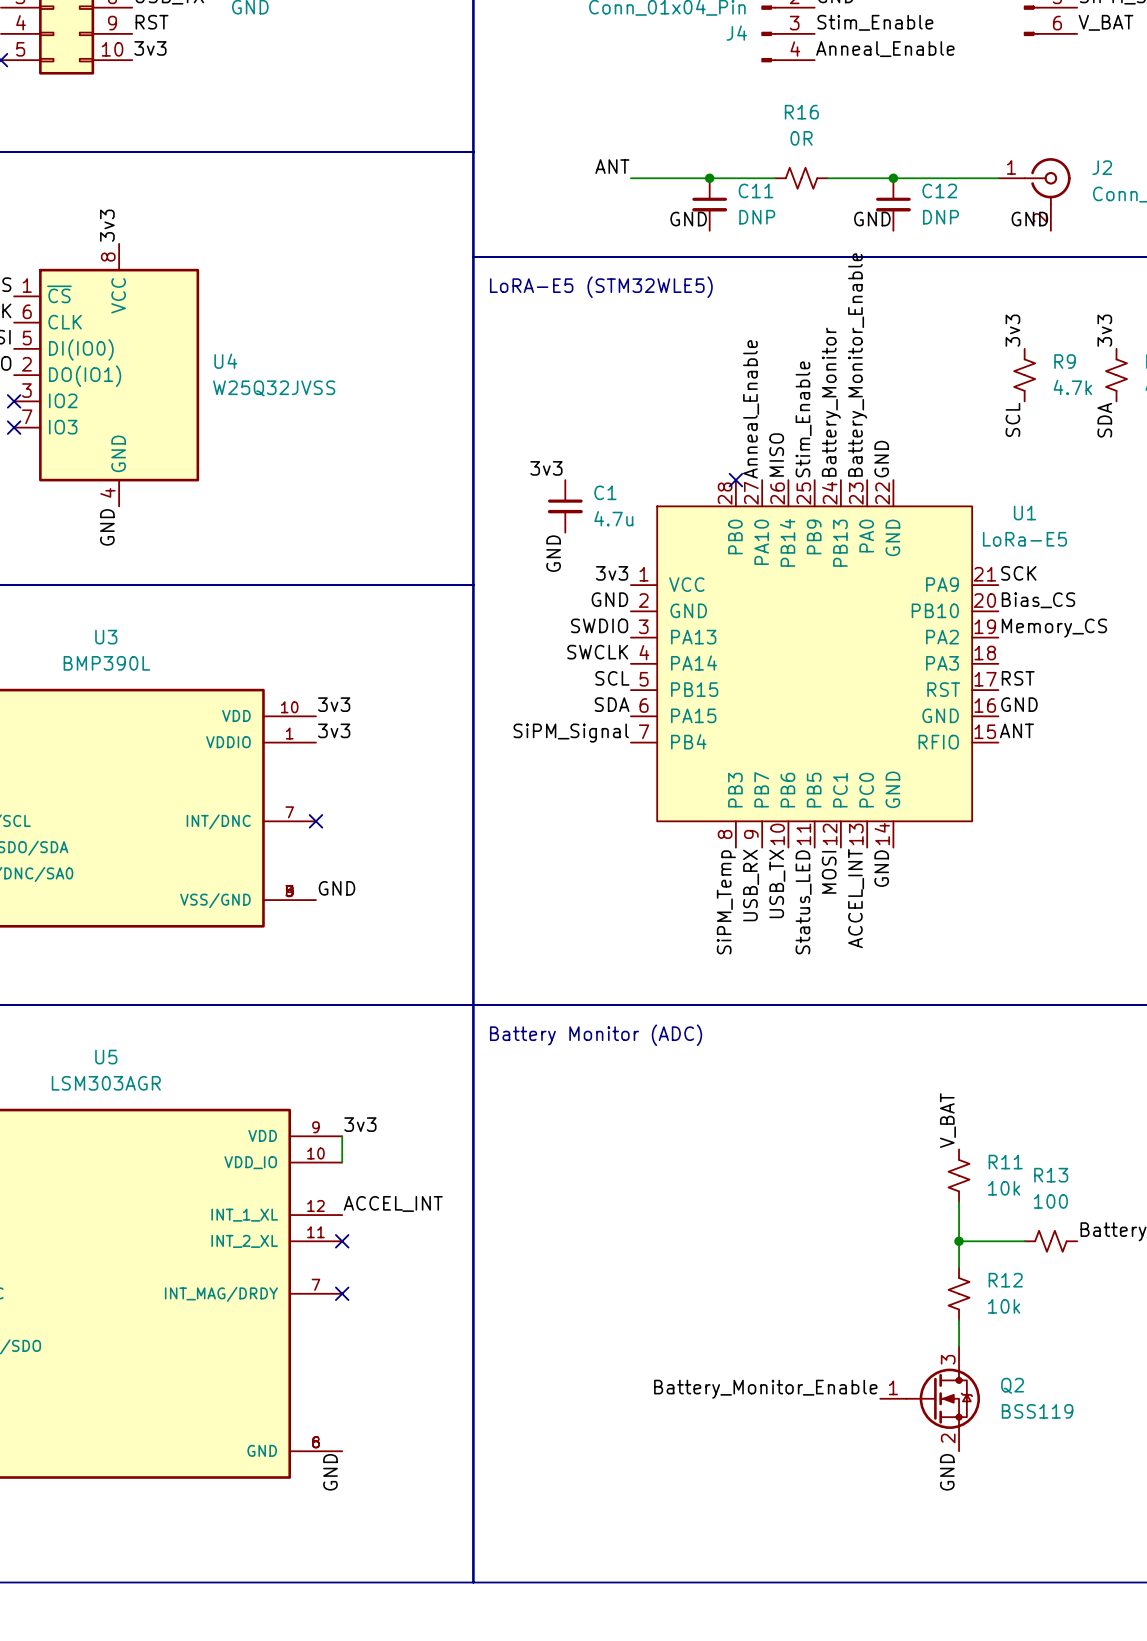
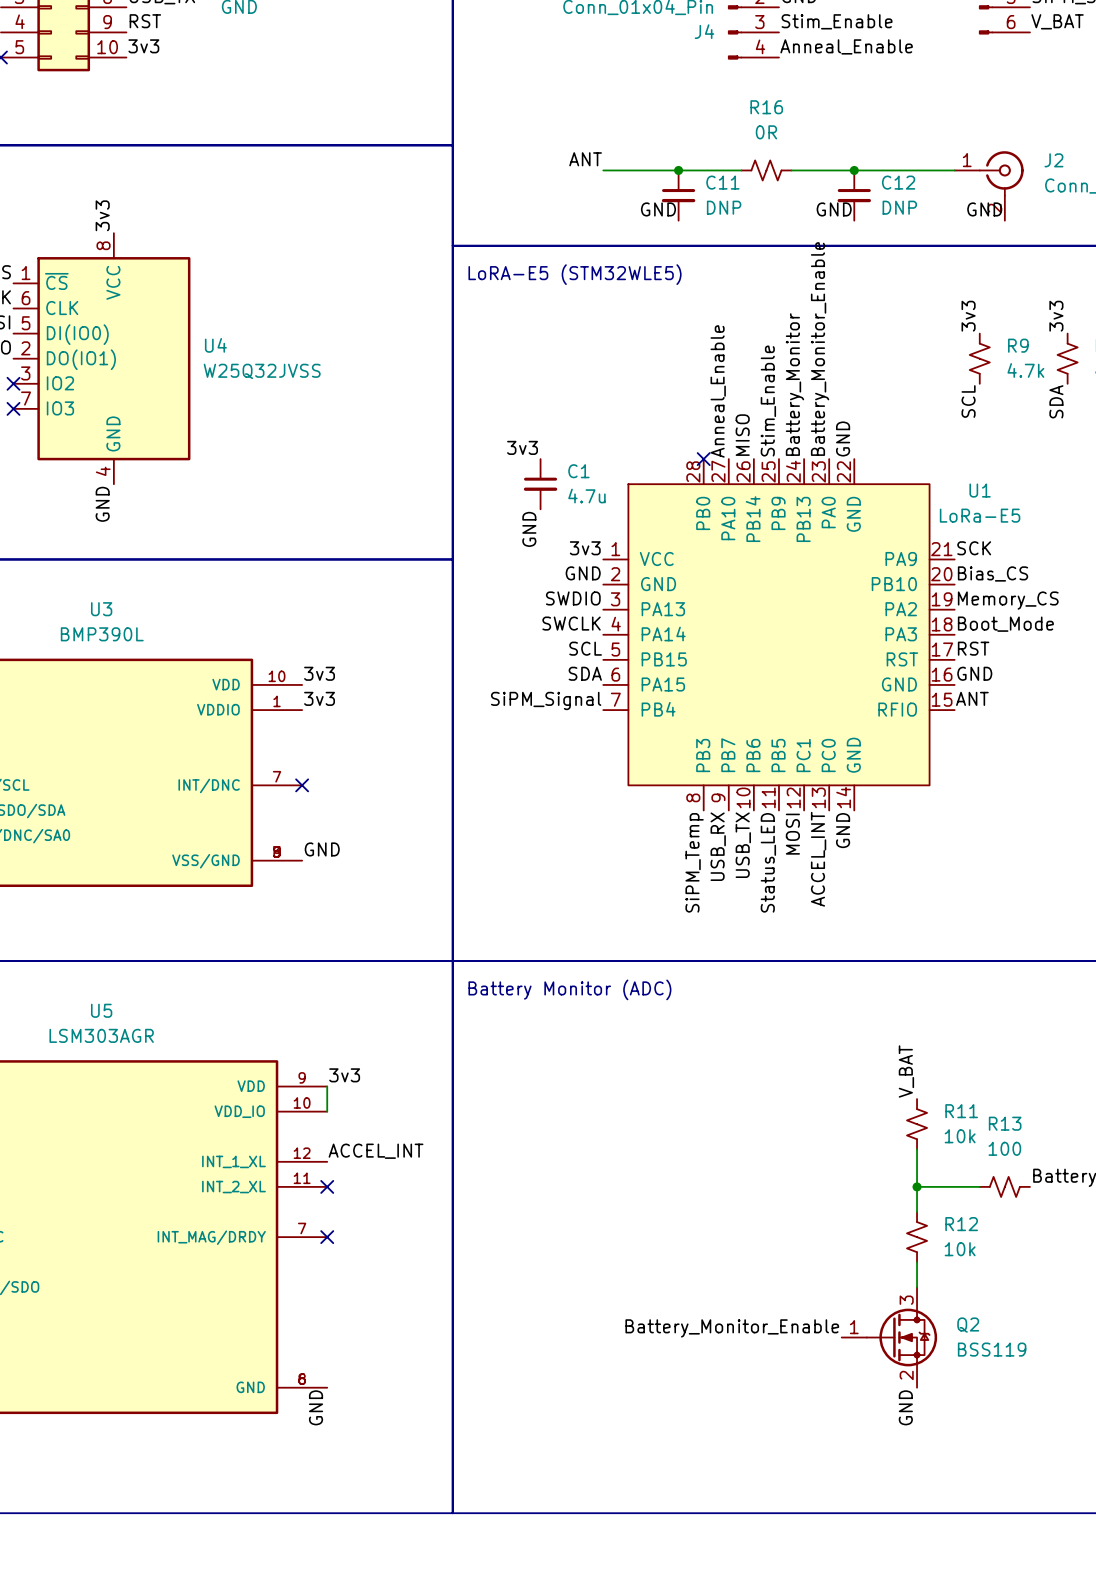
label: none -> Boot_Mode (1005, 624)

